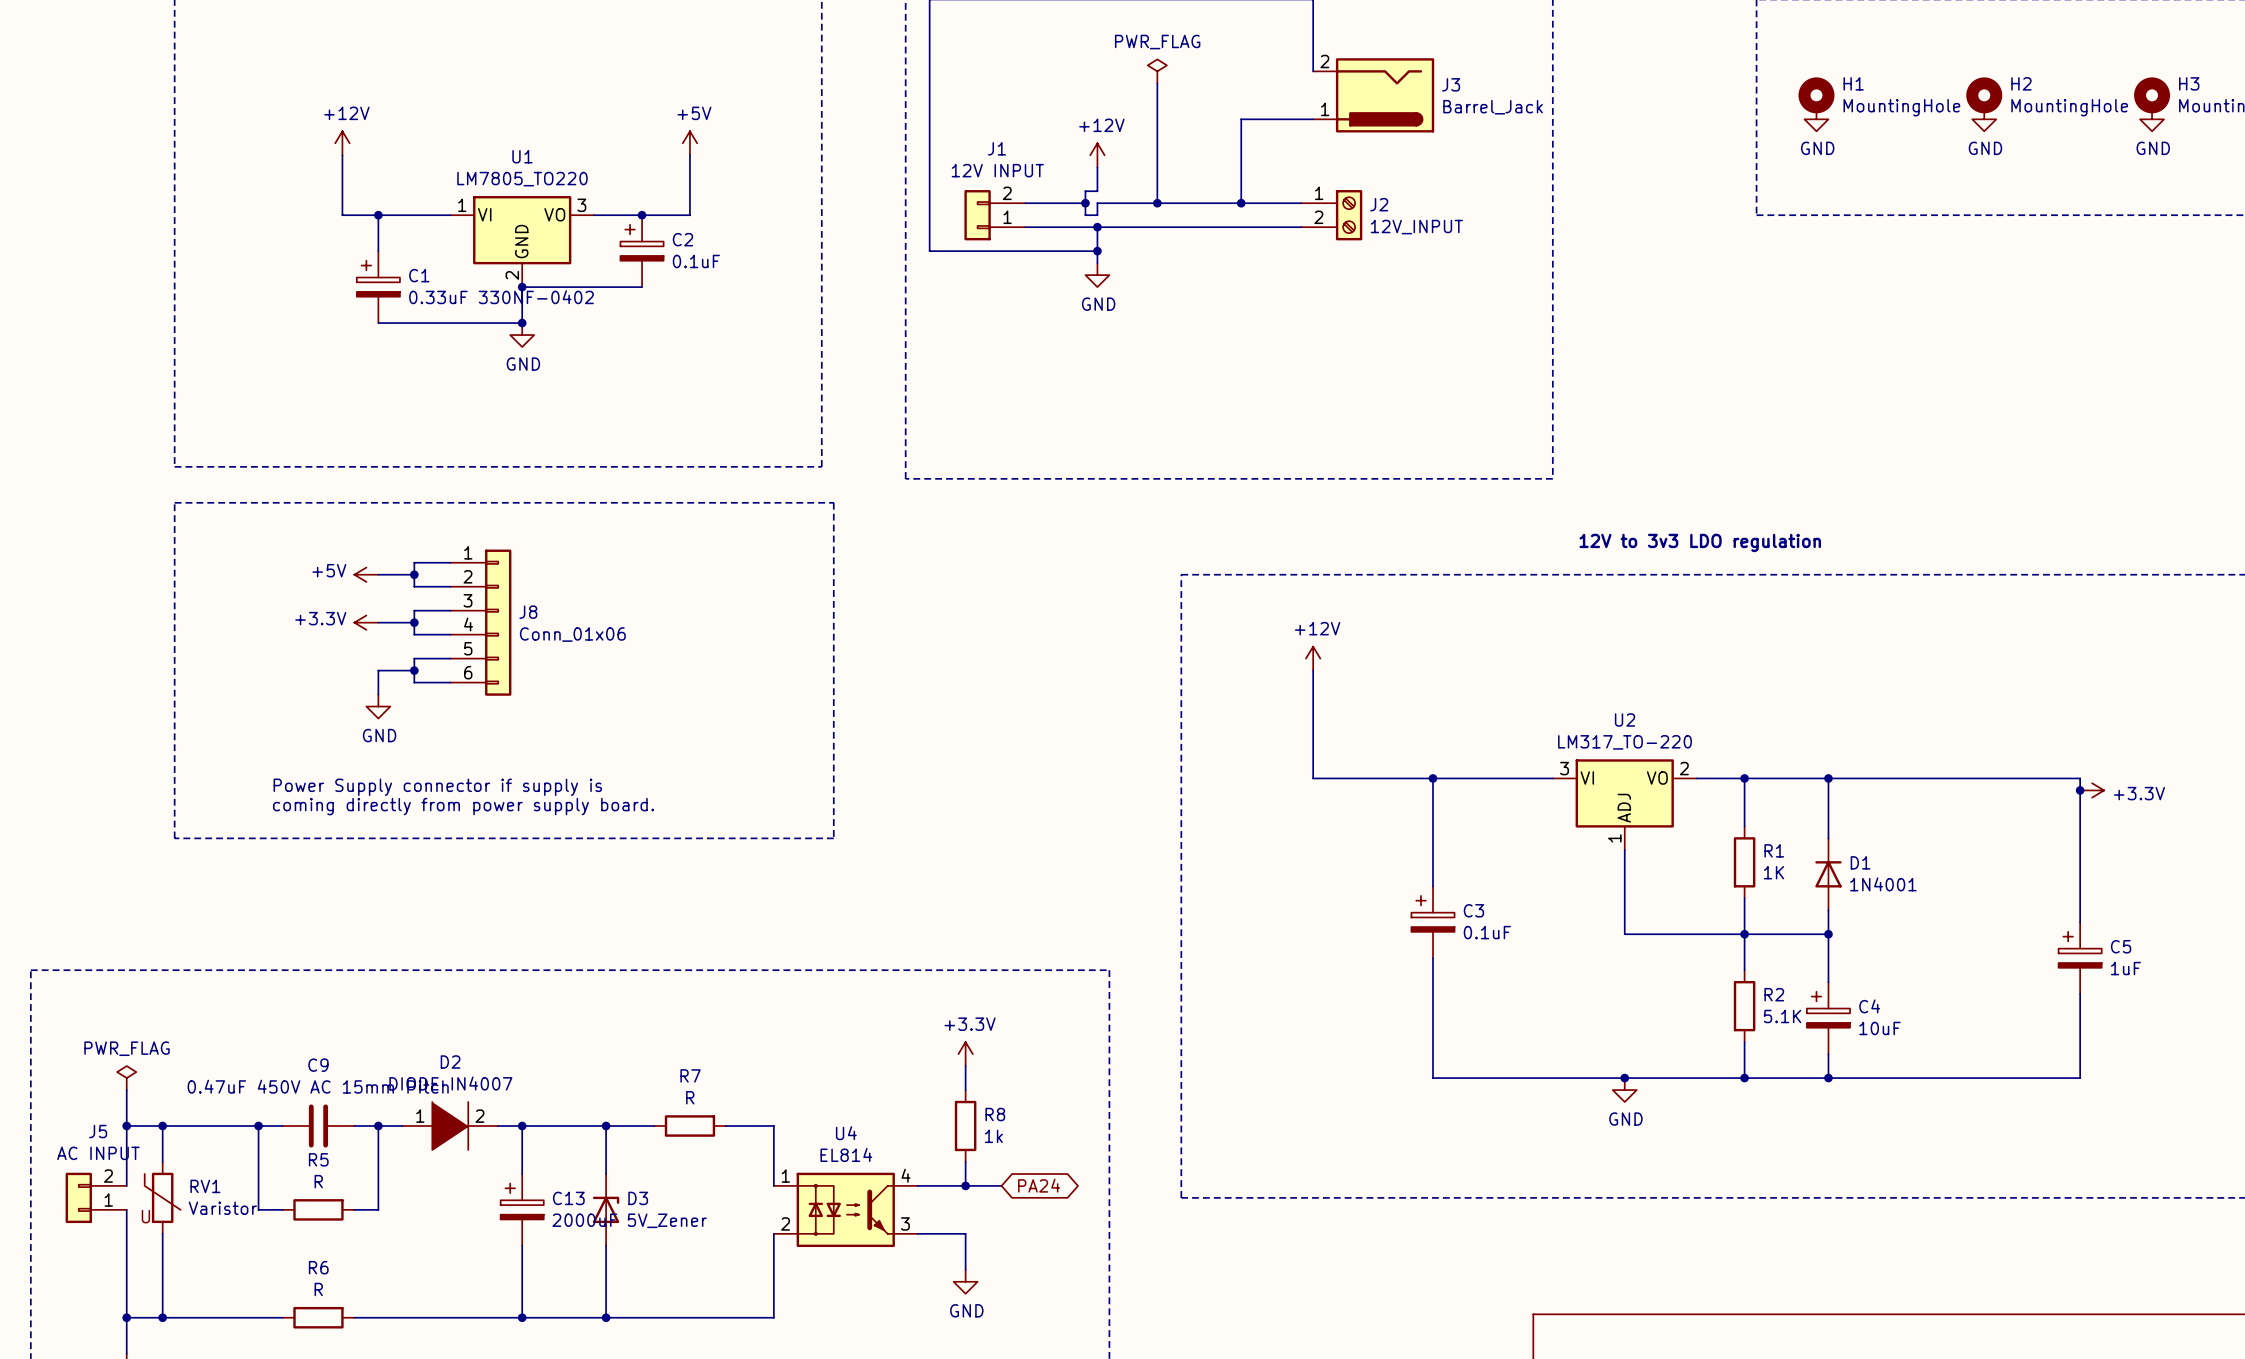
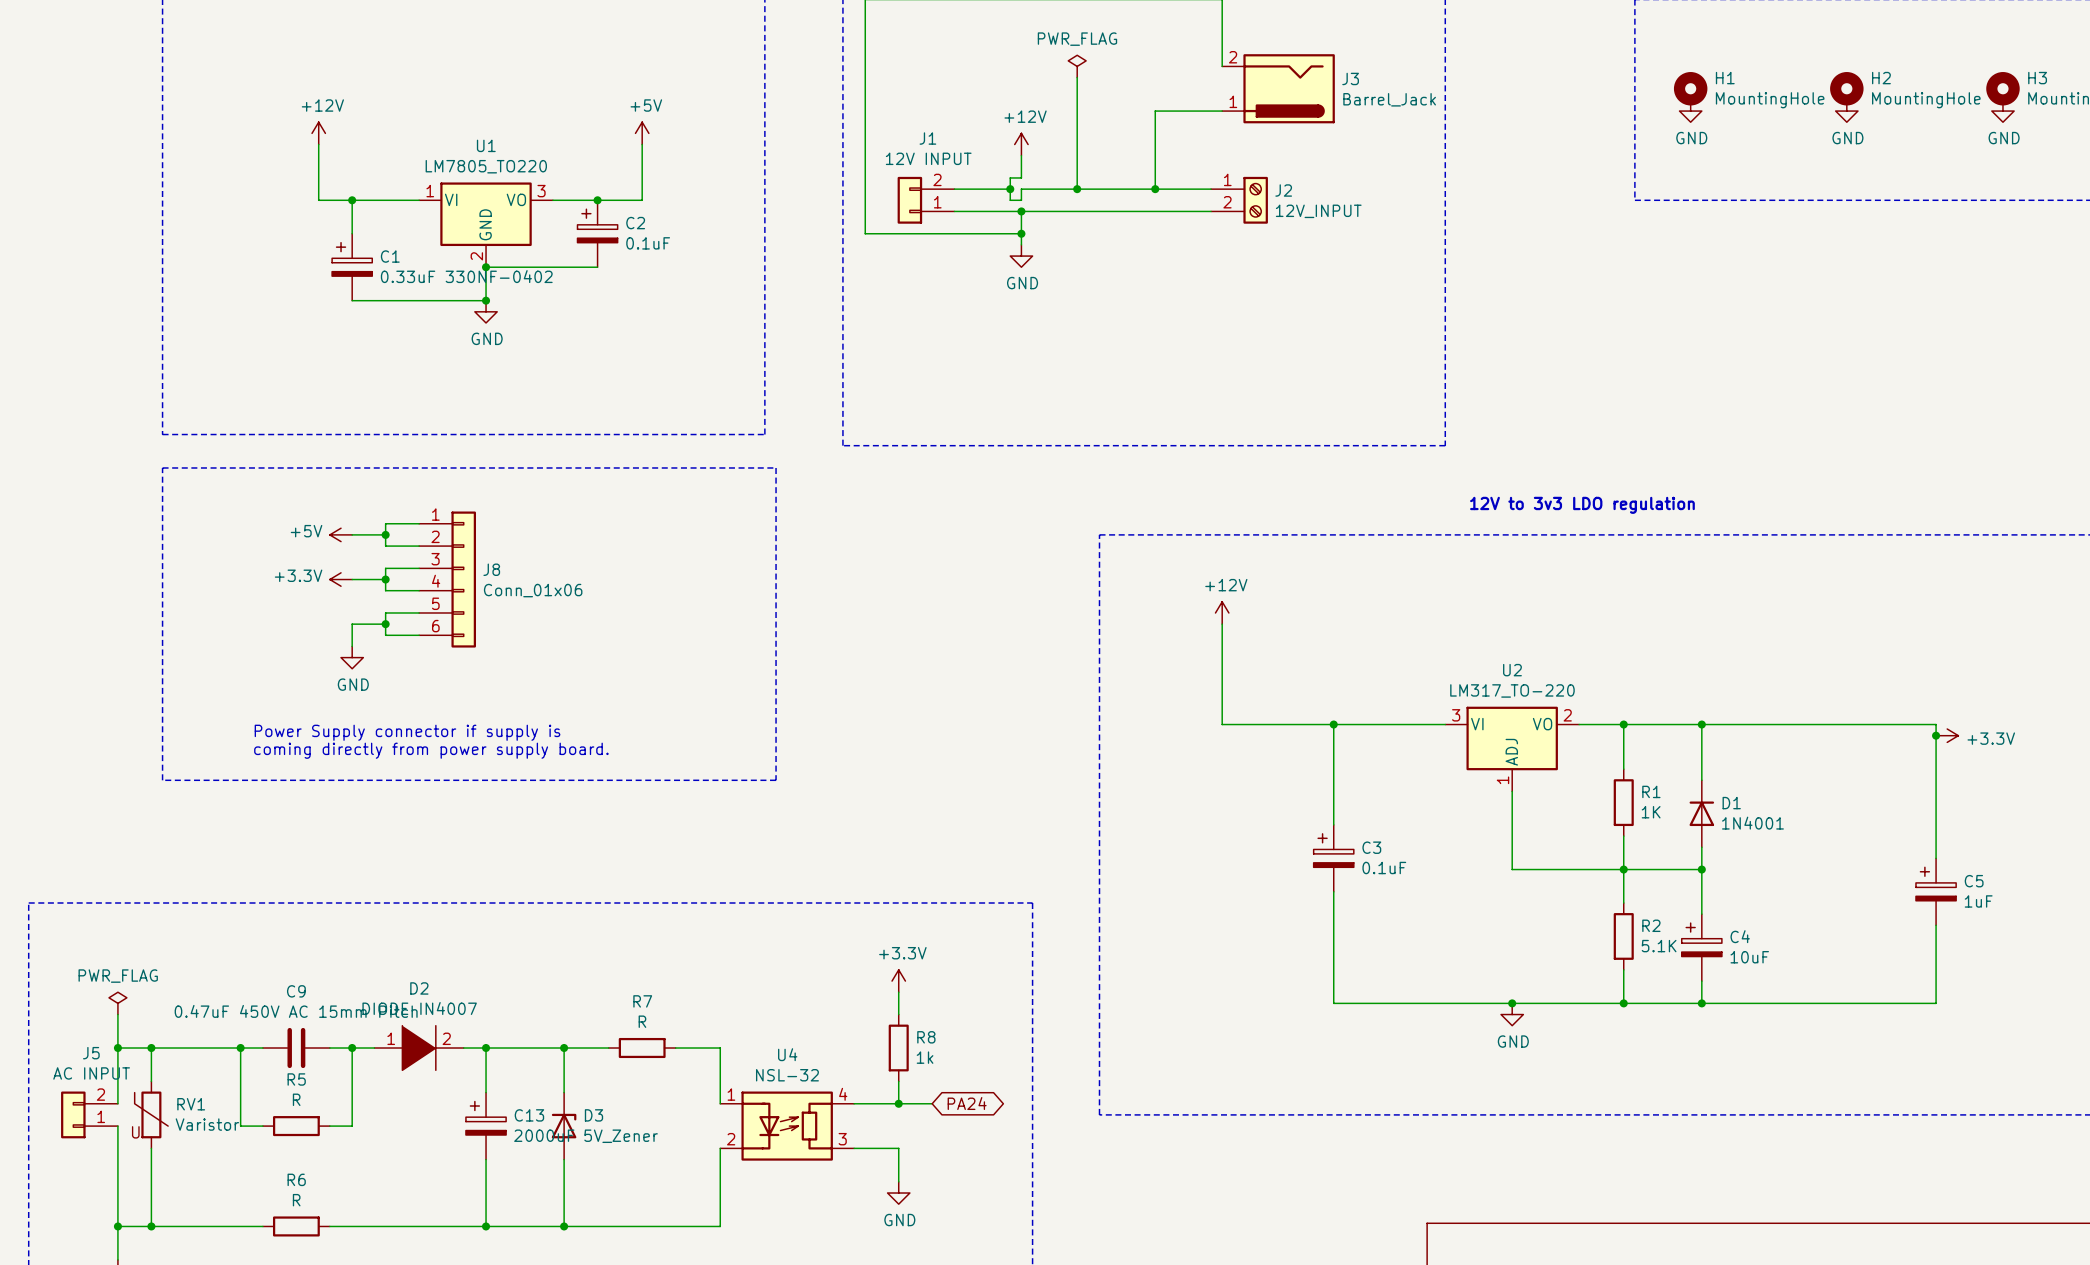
U4 value: EL814 (846, 1154) -> NSL-32 (787, 1075)
U4 symbol: [773, 1172, 918, 1248] -> [720, 1091, 855, 1161]

